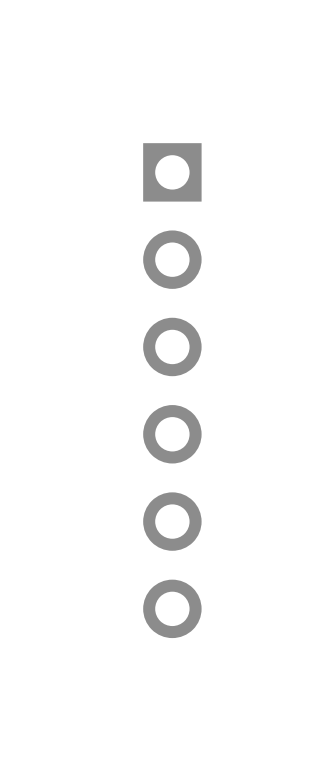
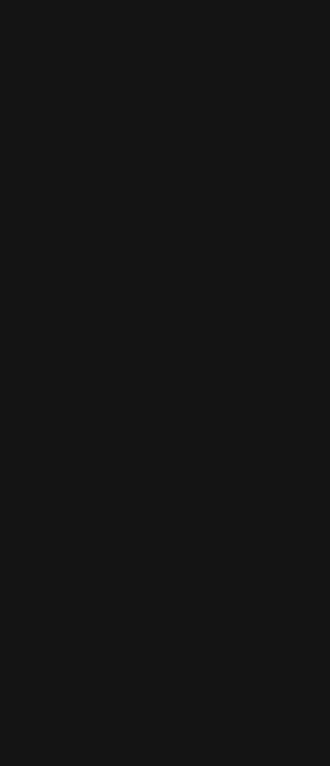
part: (172, 390) -> none

